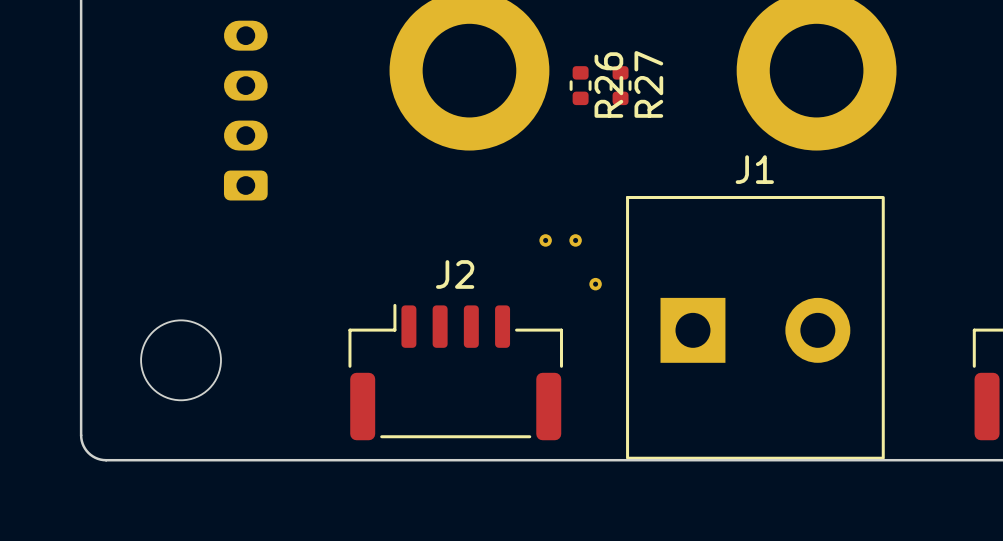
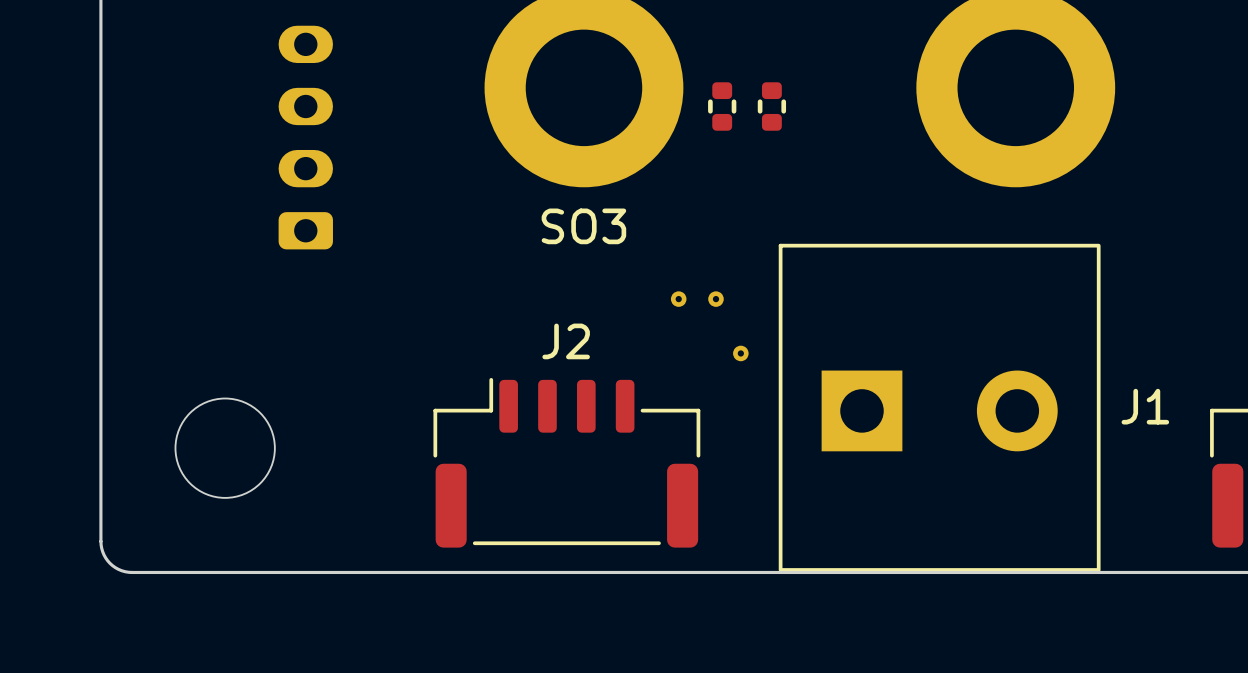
R26: (580, 85) -> none
part: none -> (722, 106)
R27: (620, 85) -> none
part: none -> (771, 106)
J1 name position: J1 (754, 169) -> J1 (1145, 406)
SO3 name: none -> SO3 (583, 226)

